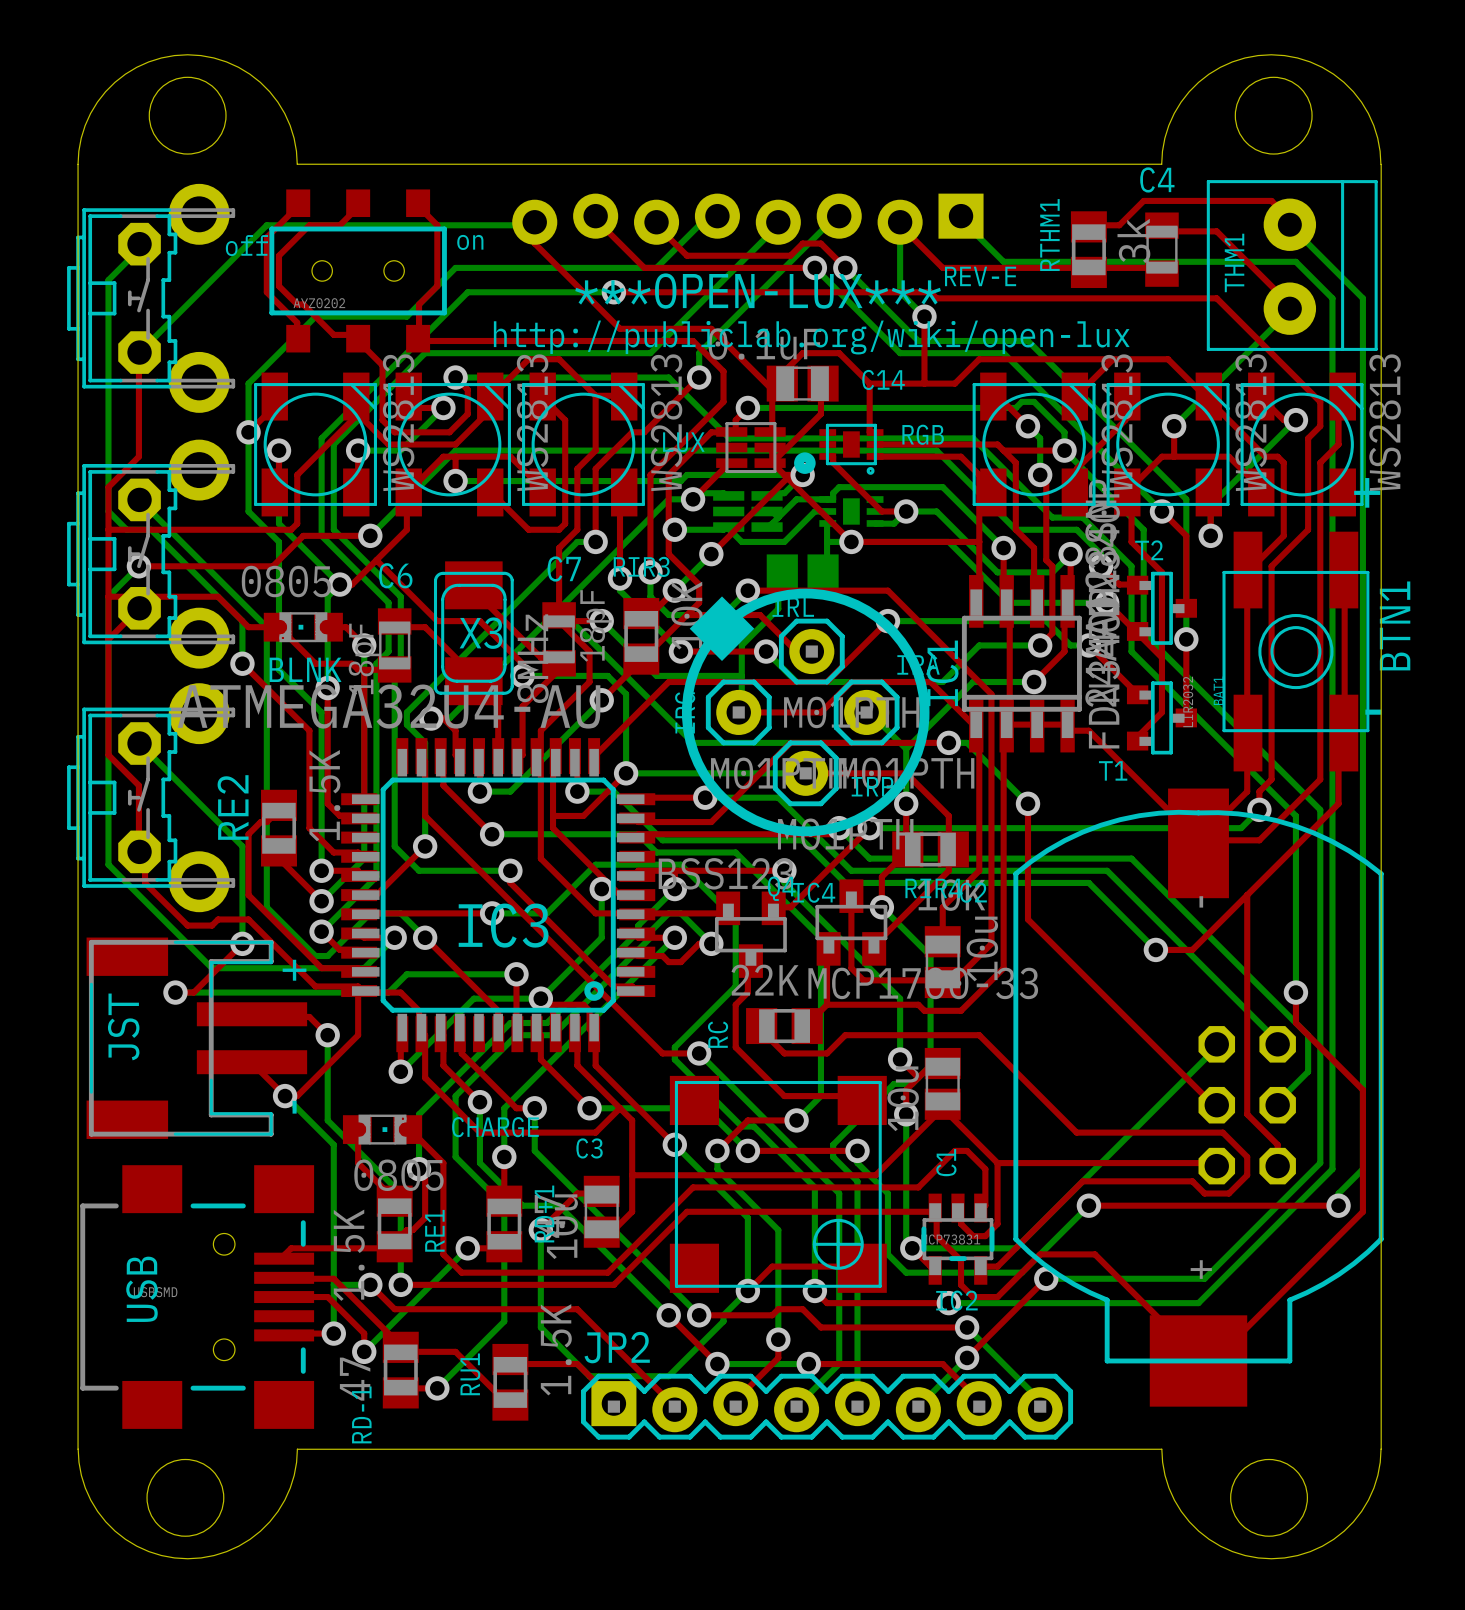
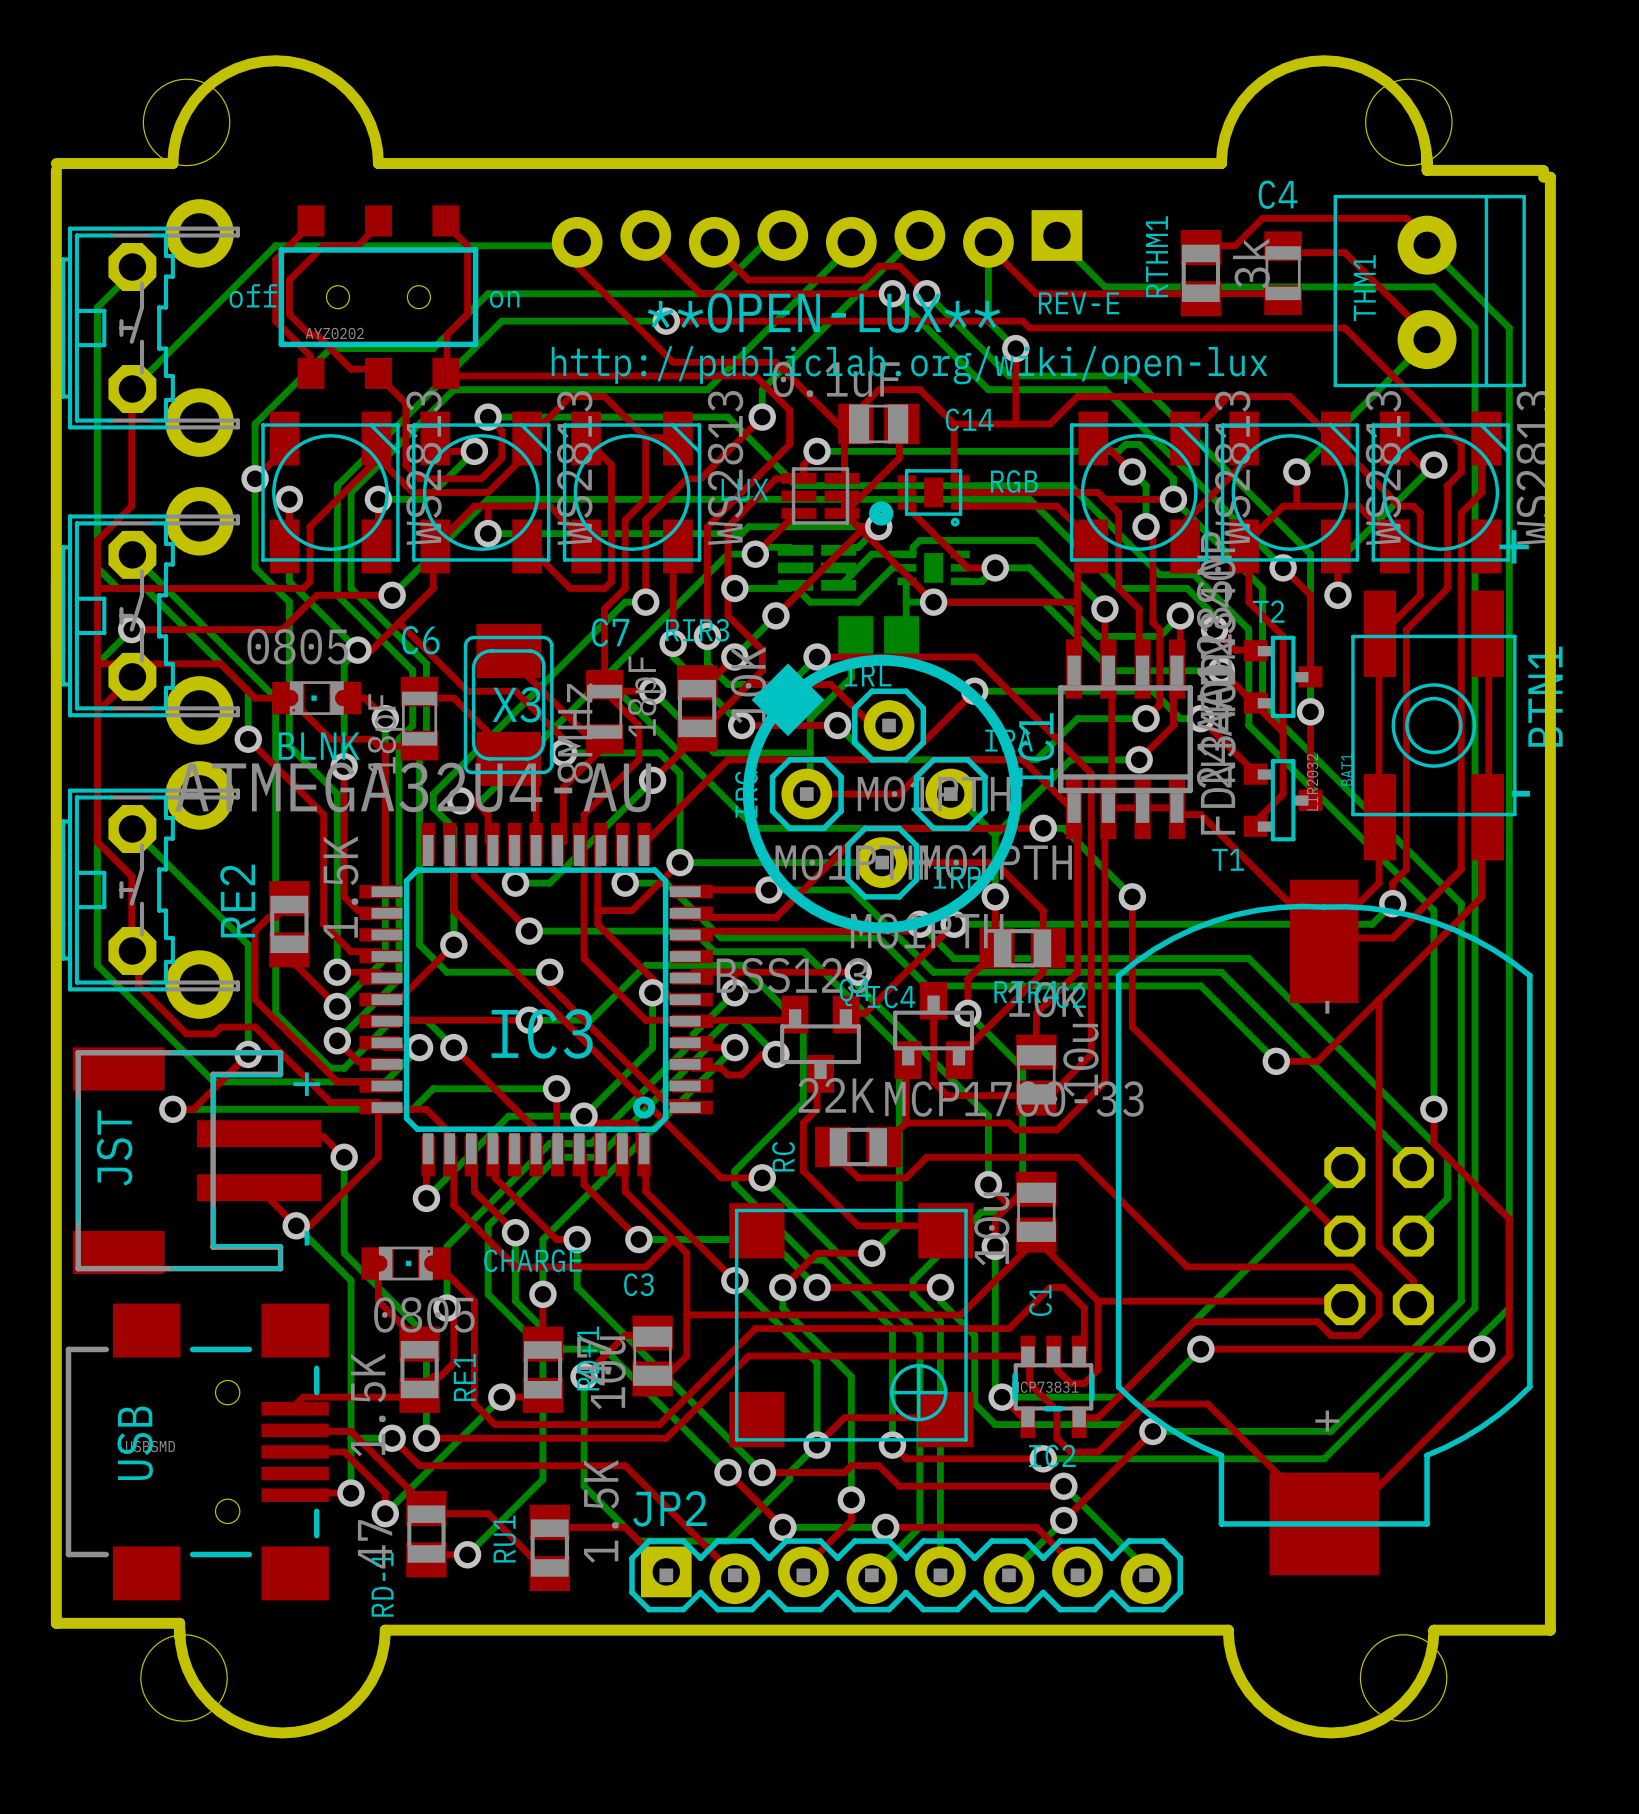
board edge: none -> (1427, 156) (1427, 170) (1543, 170)
board edge: none -> (56, 163) (172, 163) (176, 136) (180, 124) (186, 112) (202, 90) (224, 74) (236, 68) (249, 64) (275, 60) (302, 64) (314, 68) (327, 74) (348, 90) (364, 112) (370, 124) (374, 136) (378, 163) (1221, 163) (1224, 136) (1229, 124) (1235, 112) (1251, 90) (1272, 74) (1297, 64) (1324, 60) (1337, 61) (1350, 64) (1375, 74) (1396, 90) (1413, 112) (1419, 124) (1423, 136) (1427, 163)
board edge: none -> (56, 170) (56, 1623) (179, 1623) (179, 1637)
board edge: (297, 164) (1161, 164) -> none
board edge: (297, 164) (296, 151) (290, 125) (277, 102) (269, 91) (249, 74) (238, 67) (226, 61) (200, 55) (174, 55) (161, 57) (148, 61) (125, 74) (114, 82) (97, 102) (85, 125) (78, 151) (78, 1449) -> none
board edge: (1161, 164) (1162, 151) (1168, 125) (1181, 102) (1189, 91) (1209, 74) (1232, 61) (1258, 55) (1271, 54) (1284, 55) (1310, 61) (1333, 74) (1343, 82) (1361, 102) (1373, 125) (1380, 151) (1380, 164) -> none
board edge: (1381, 164) (1381, 1449) -> none
board edge: none -> (1543, 177) (1550, 177) (1550, 1630) (1433, 1630) (1430, 1656) (1426, 1669) (1420, 1681) (1403, 1702) (1382, 1719) (1370, 1725) (1357, 1729) (1331, 1732) (1304, 1729) (1291, 1725) (1279, 1719) (1258, 1702) (1242, 1681) (1236, 1669) (1231, 1656) (1228, 1630) (385, 1630) (381, 1656) (377, 1669) (371, 1681) (355, 1702) (333, 1719) (309, 1729) (282, 1732) (269, 1732) (255, 1729) (231, 1719) (209, 1702) (193, 1681) (187, 1669) (183, 1656) (179, 1630)
text position: on (470, 242) -> on (504, 299)
text position: off (246, 245) -> off (253, 296)
text: ***OPEN-LUX*** (758, 291) -> **OPEN-LUX** (823, 312)
text position: http://publiclab.org/wiki/open-lux (811, 337) -> http://publiclab.org/wiki/open-lux (909, 365)
board edge: (78, 1449) (78, 1462) (85, 1488) (97, 1511) (105, 1521) (125, 1539) (148, 1551) (174, 1557) (187, 1558) (201, 1557) (226, 1551) (250, 1539) (260, 1531) (278, 1511) (290, 1488) (296, 1462) (297, 1449) -> none
board edge: (297, 1449) (1161, 1449) -> none
board edge: (1161, 1449) (1162, 1462) (1168, 1488) (1181, 1511) (1189, 1521) (1209, 1539) (1232, 1551) (1258, 1557) (1271, 1558) (1284, 1557) (1310, 1551) (1333, 1539) (1344, 1531) (1361, 1511) (1373, 1488) (1380, 1462) (1381, 1449) -> none

